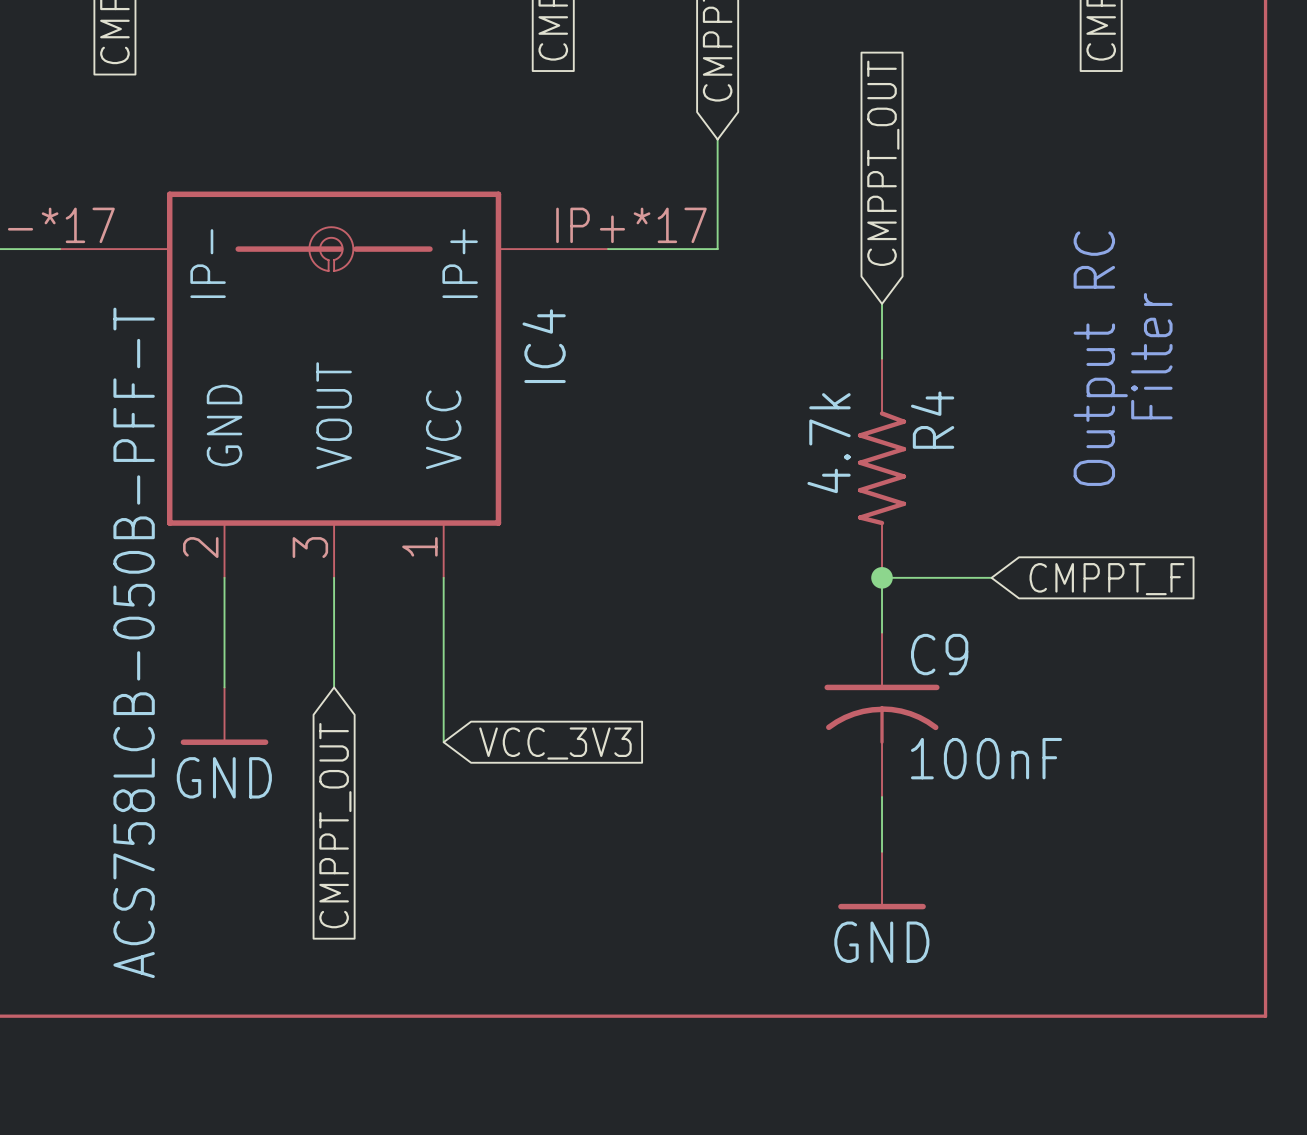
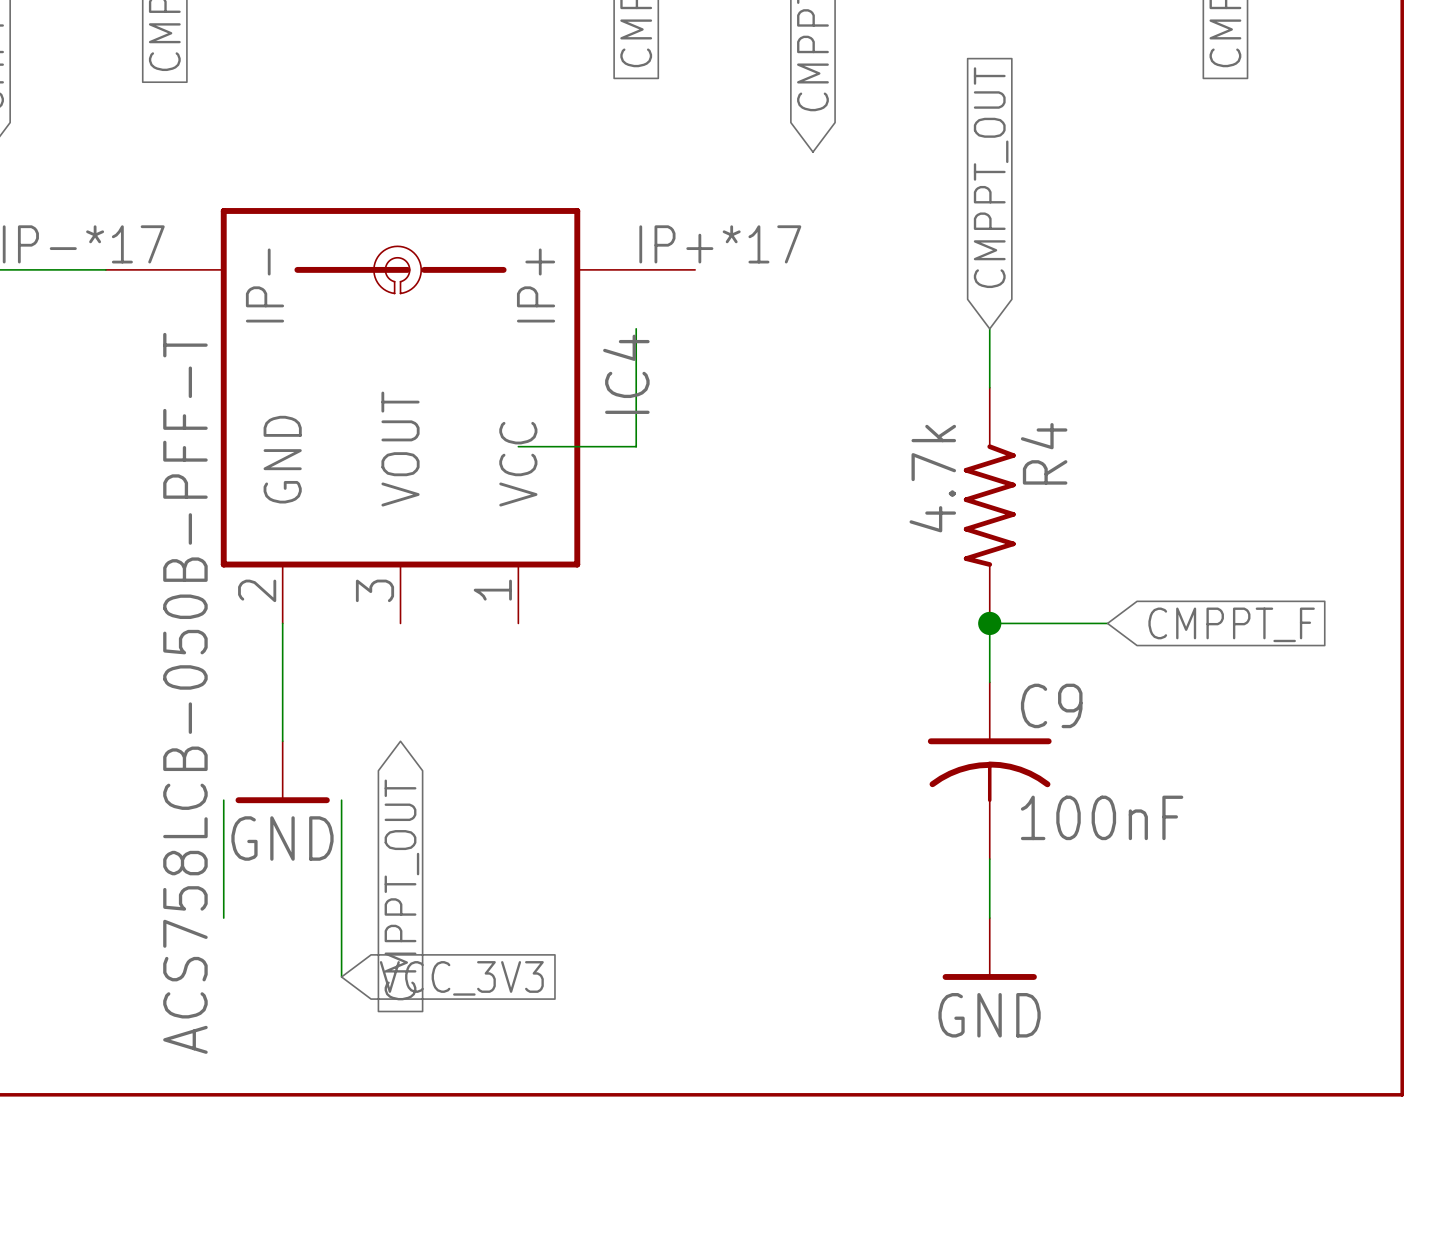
wire: (717, 139) (717, 249) (608, 249) -> (636, 328) (636, 446) (518, 446)
text: Filter (1151, 356) -> none
text: Output RC (1100, 358) -> none
wire: (334, 577) (334, 687) -> (223, 800) (223, 918)
wire: (443, 577) (443, 742) -> (341, 800) (341, 976)
global label position: VCC_3V3 (555, 743) -> VCC_3V3 (461, 978)

